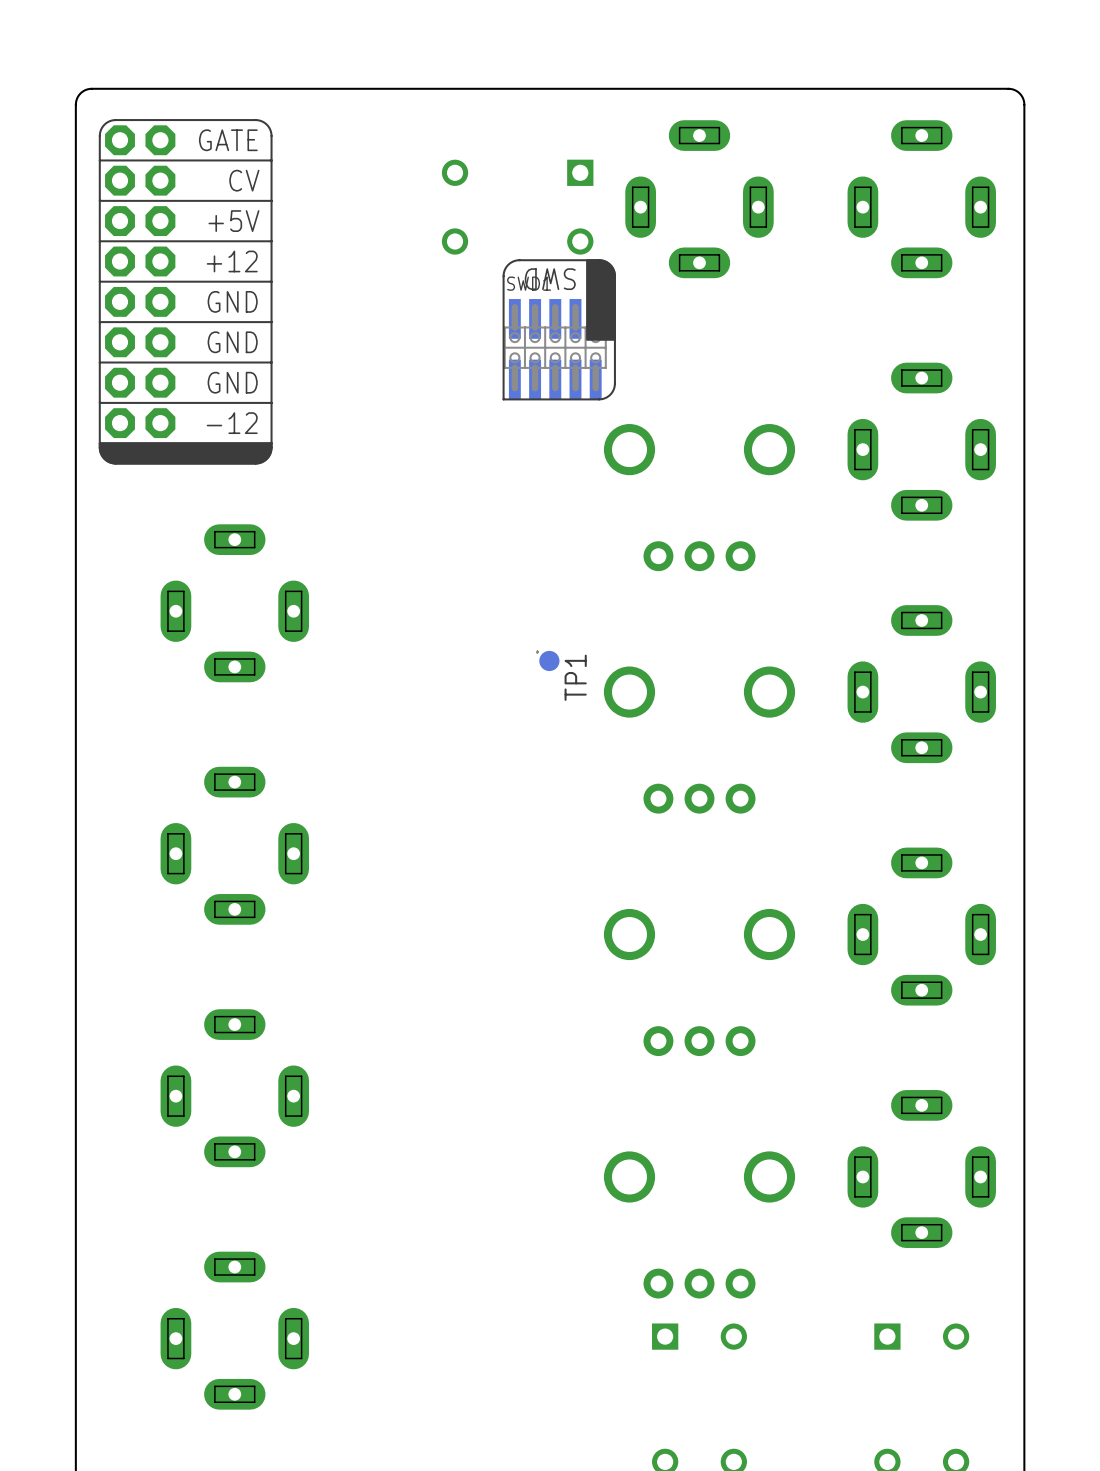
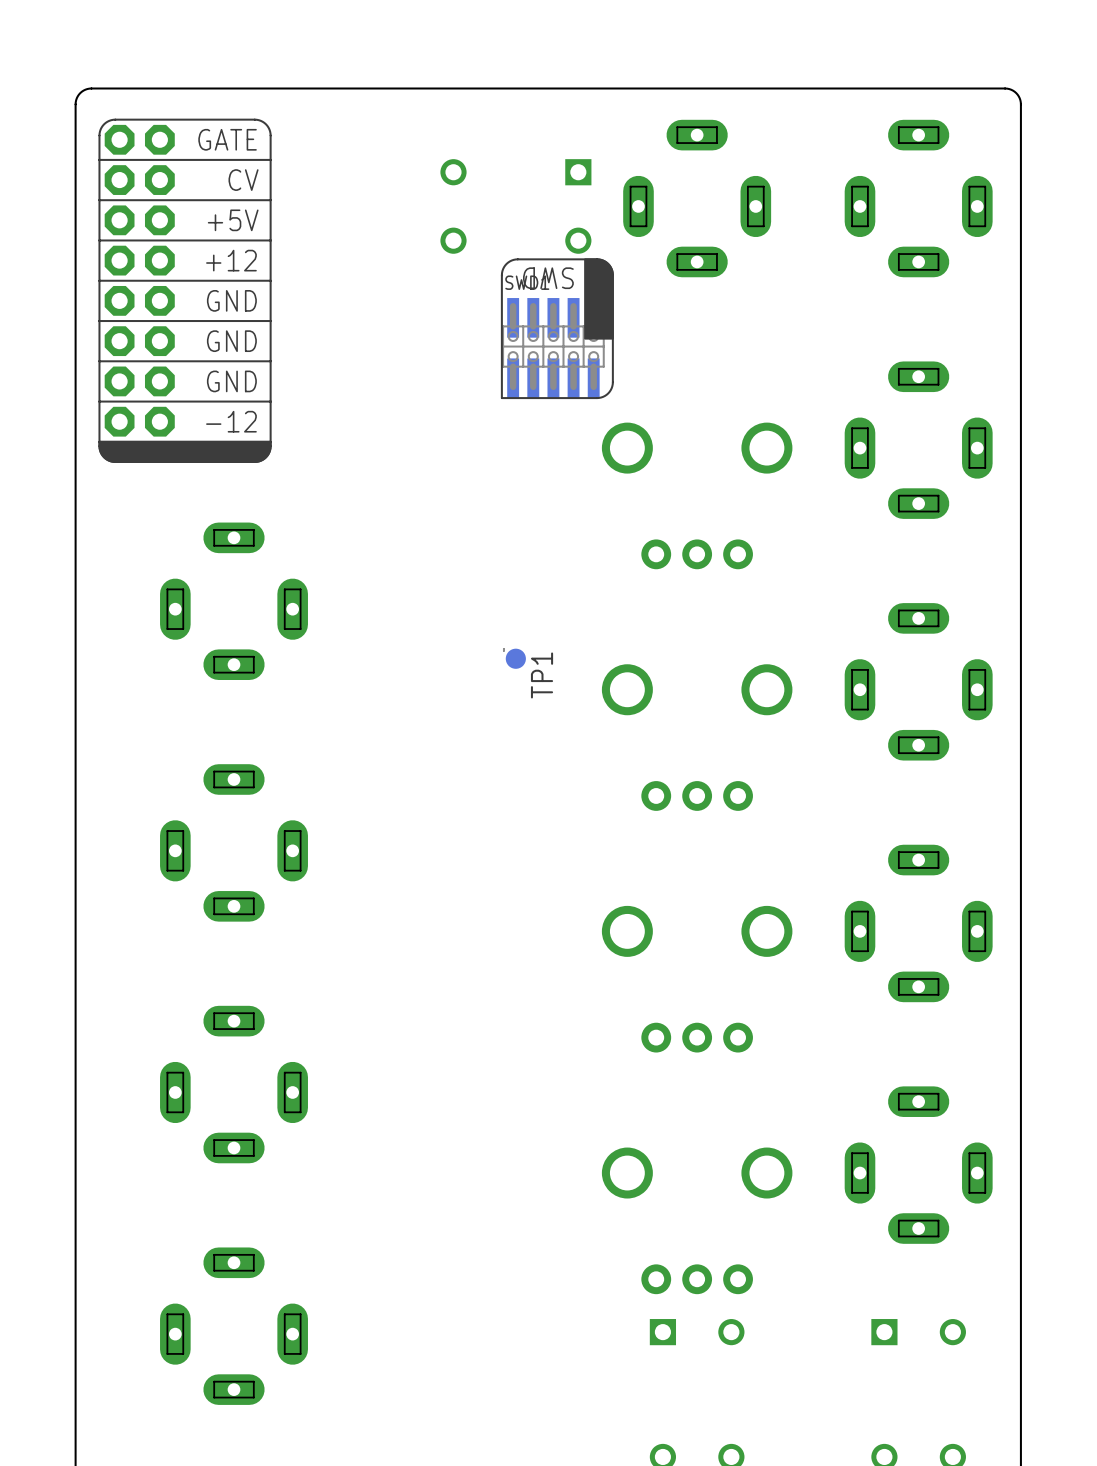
TP1 position: (549, 660) -> (515, 658)

